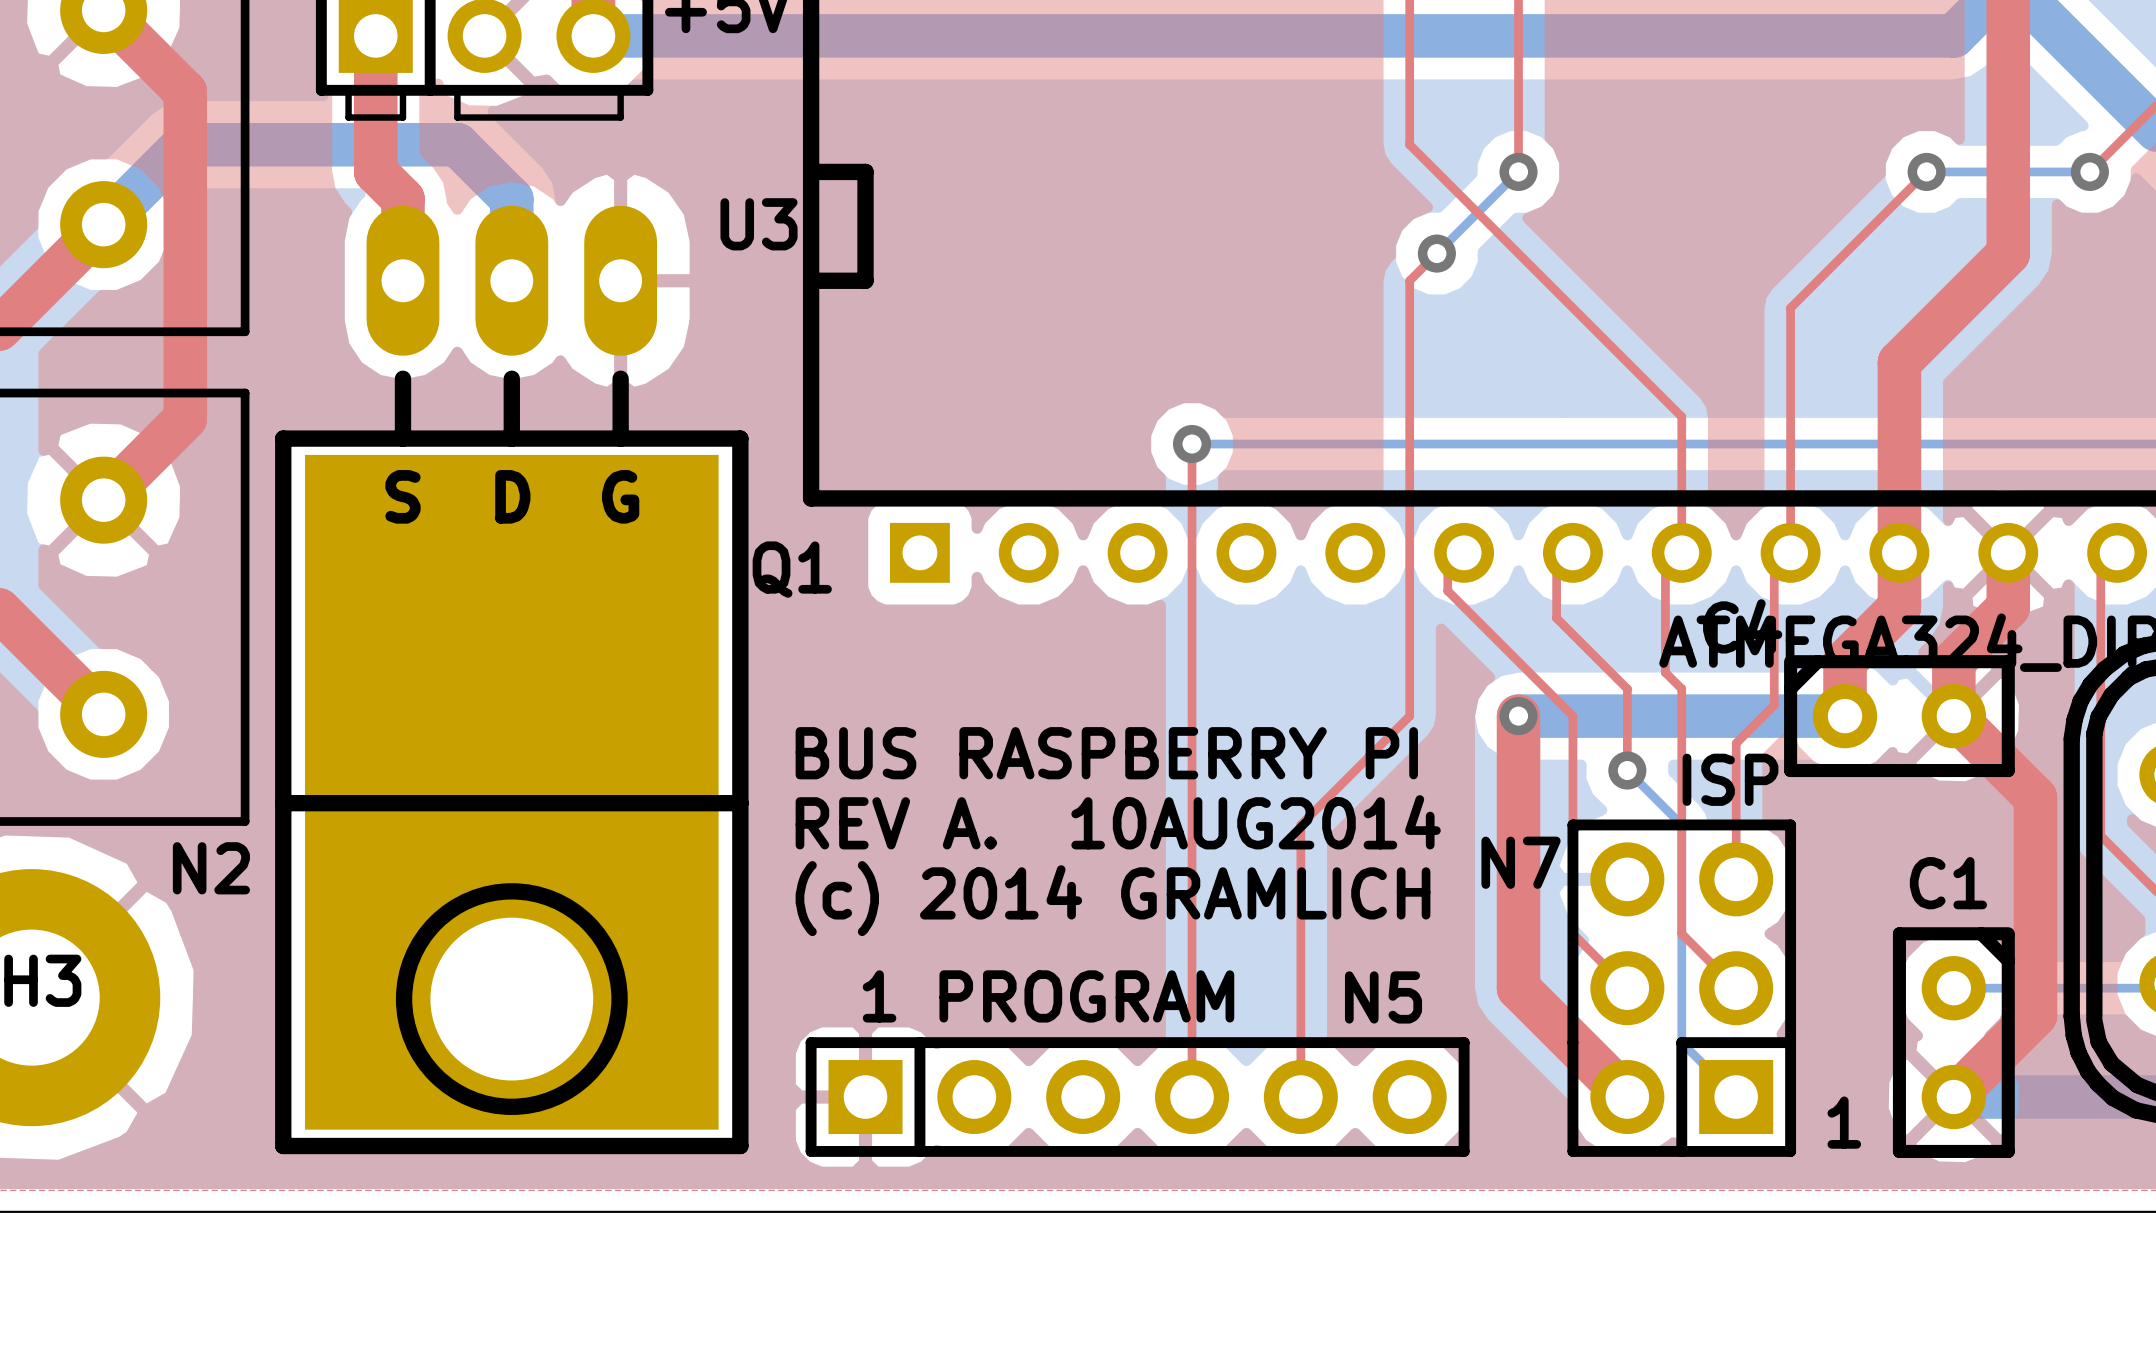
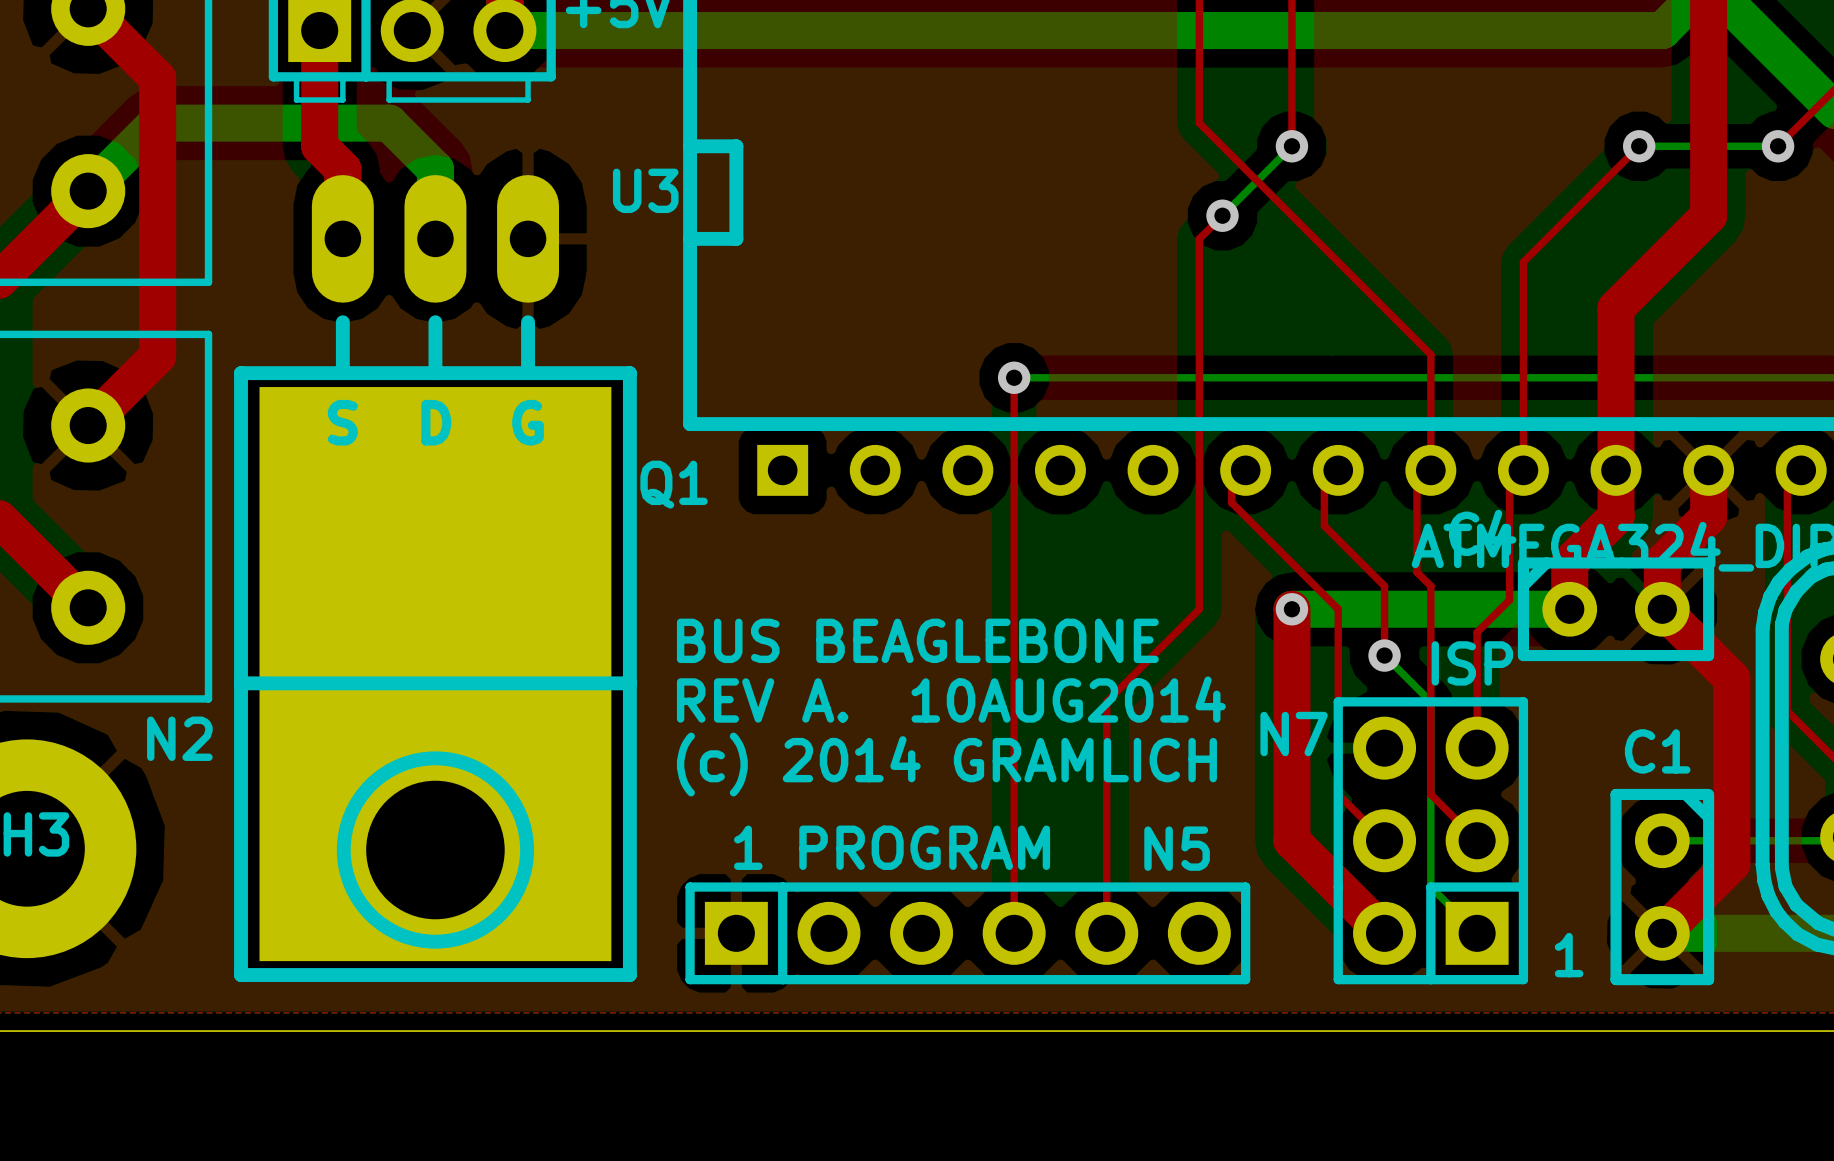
text: BUS RASPBERRY PI (1106, 753) -> BUS BEAGLEBONE (917, 640)

